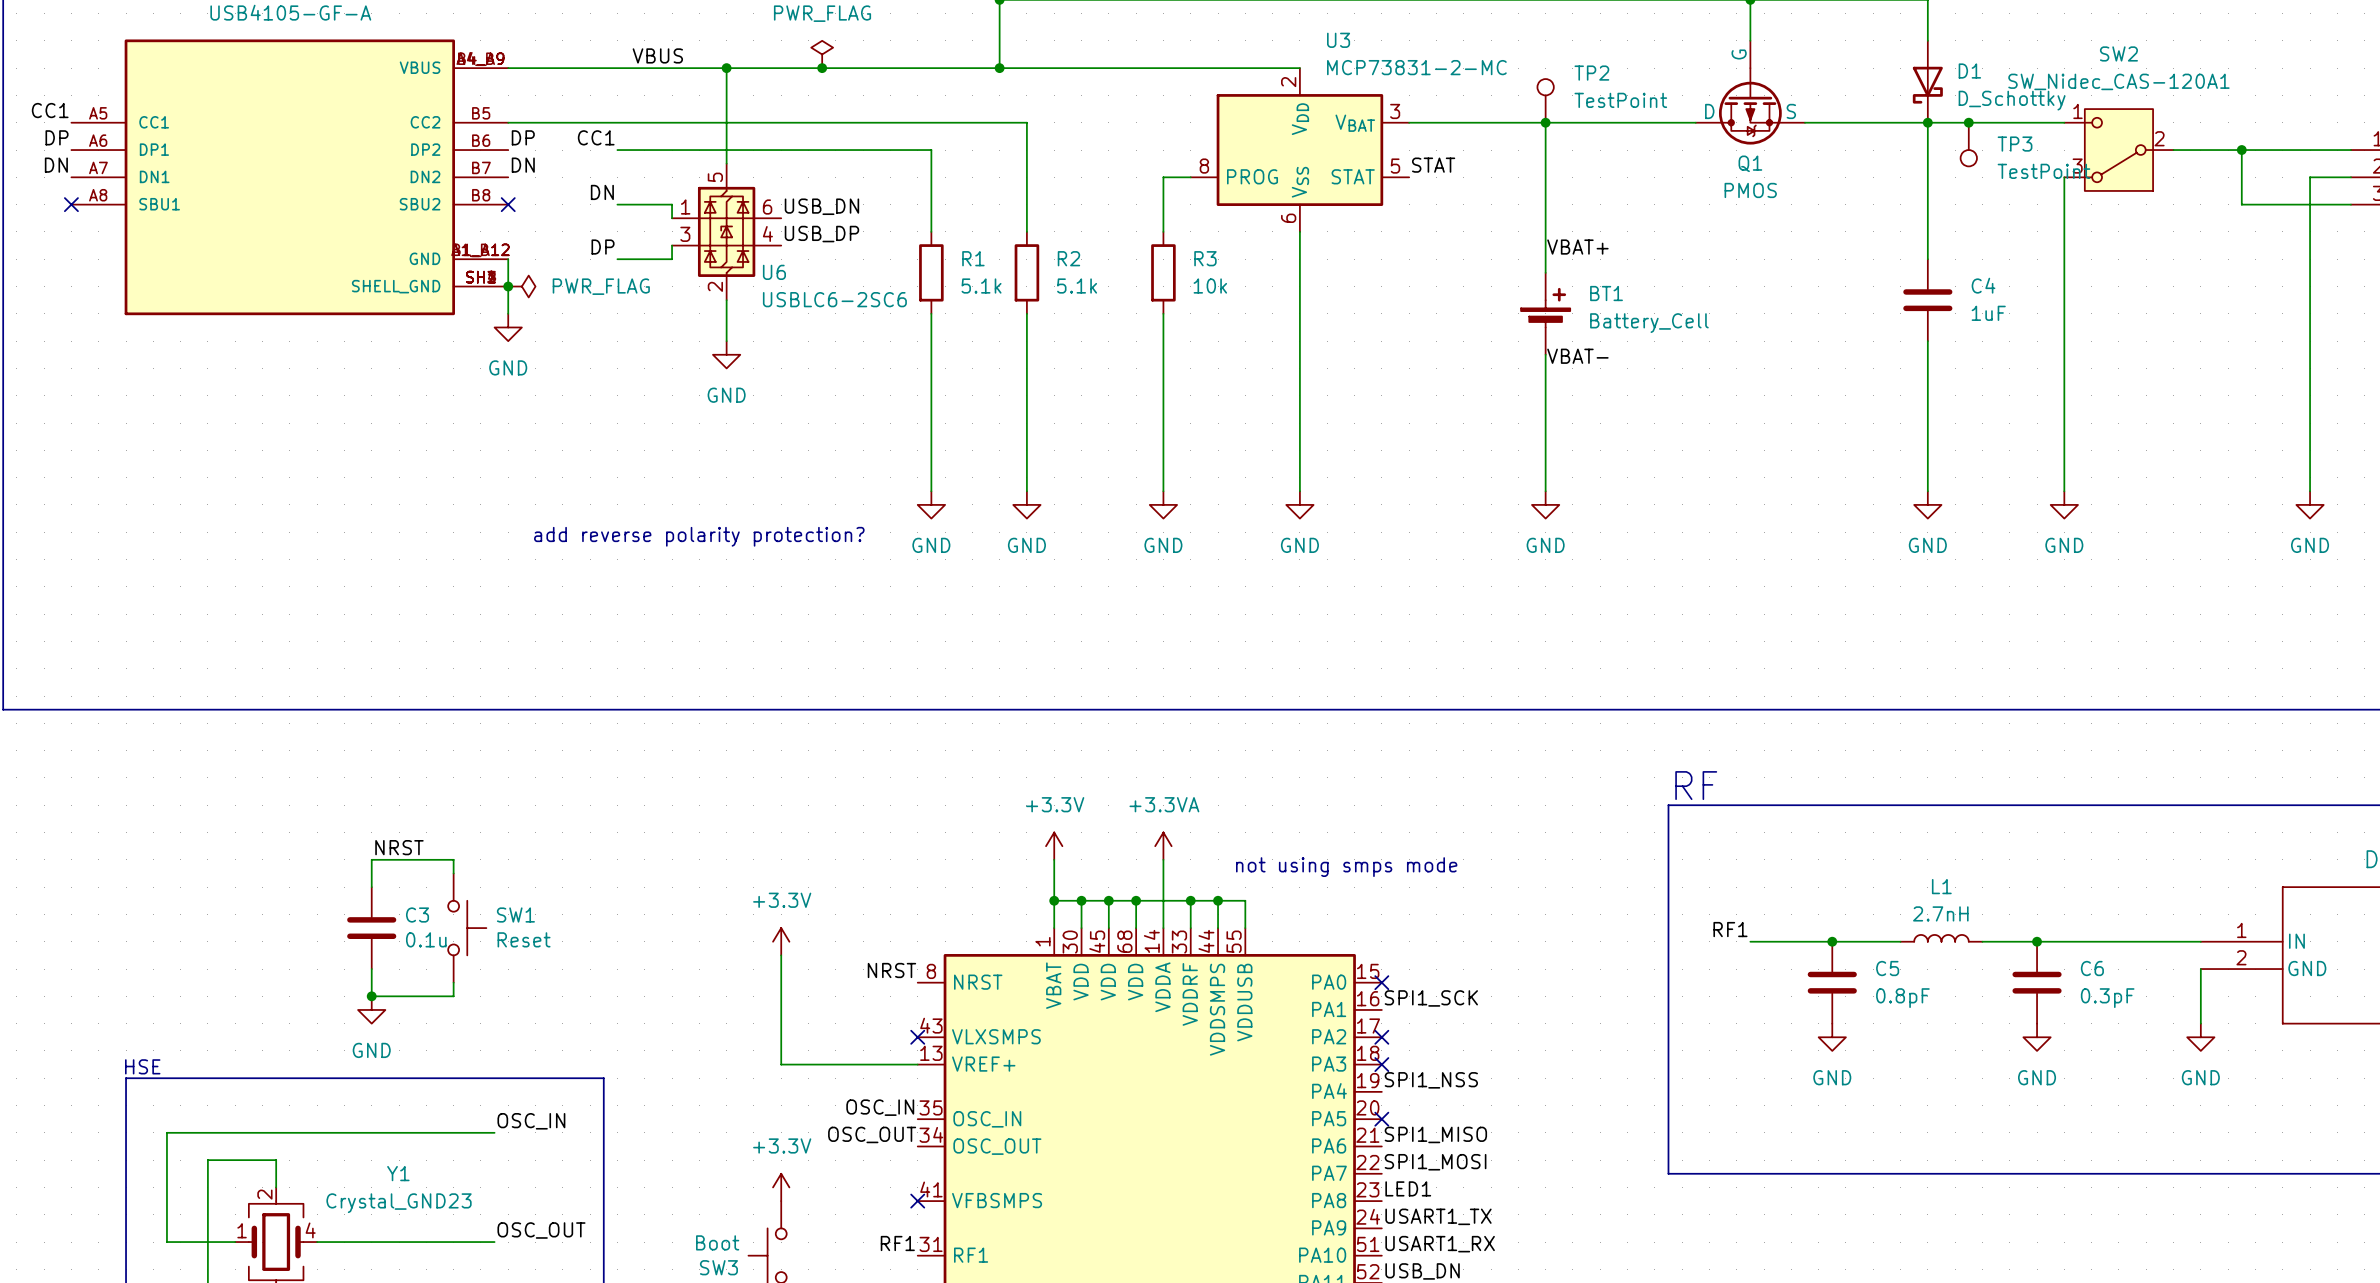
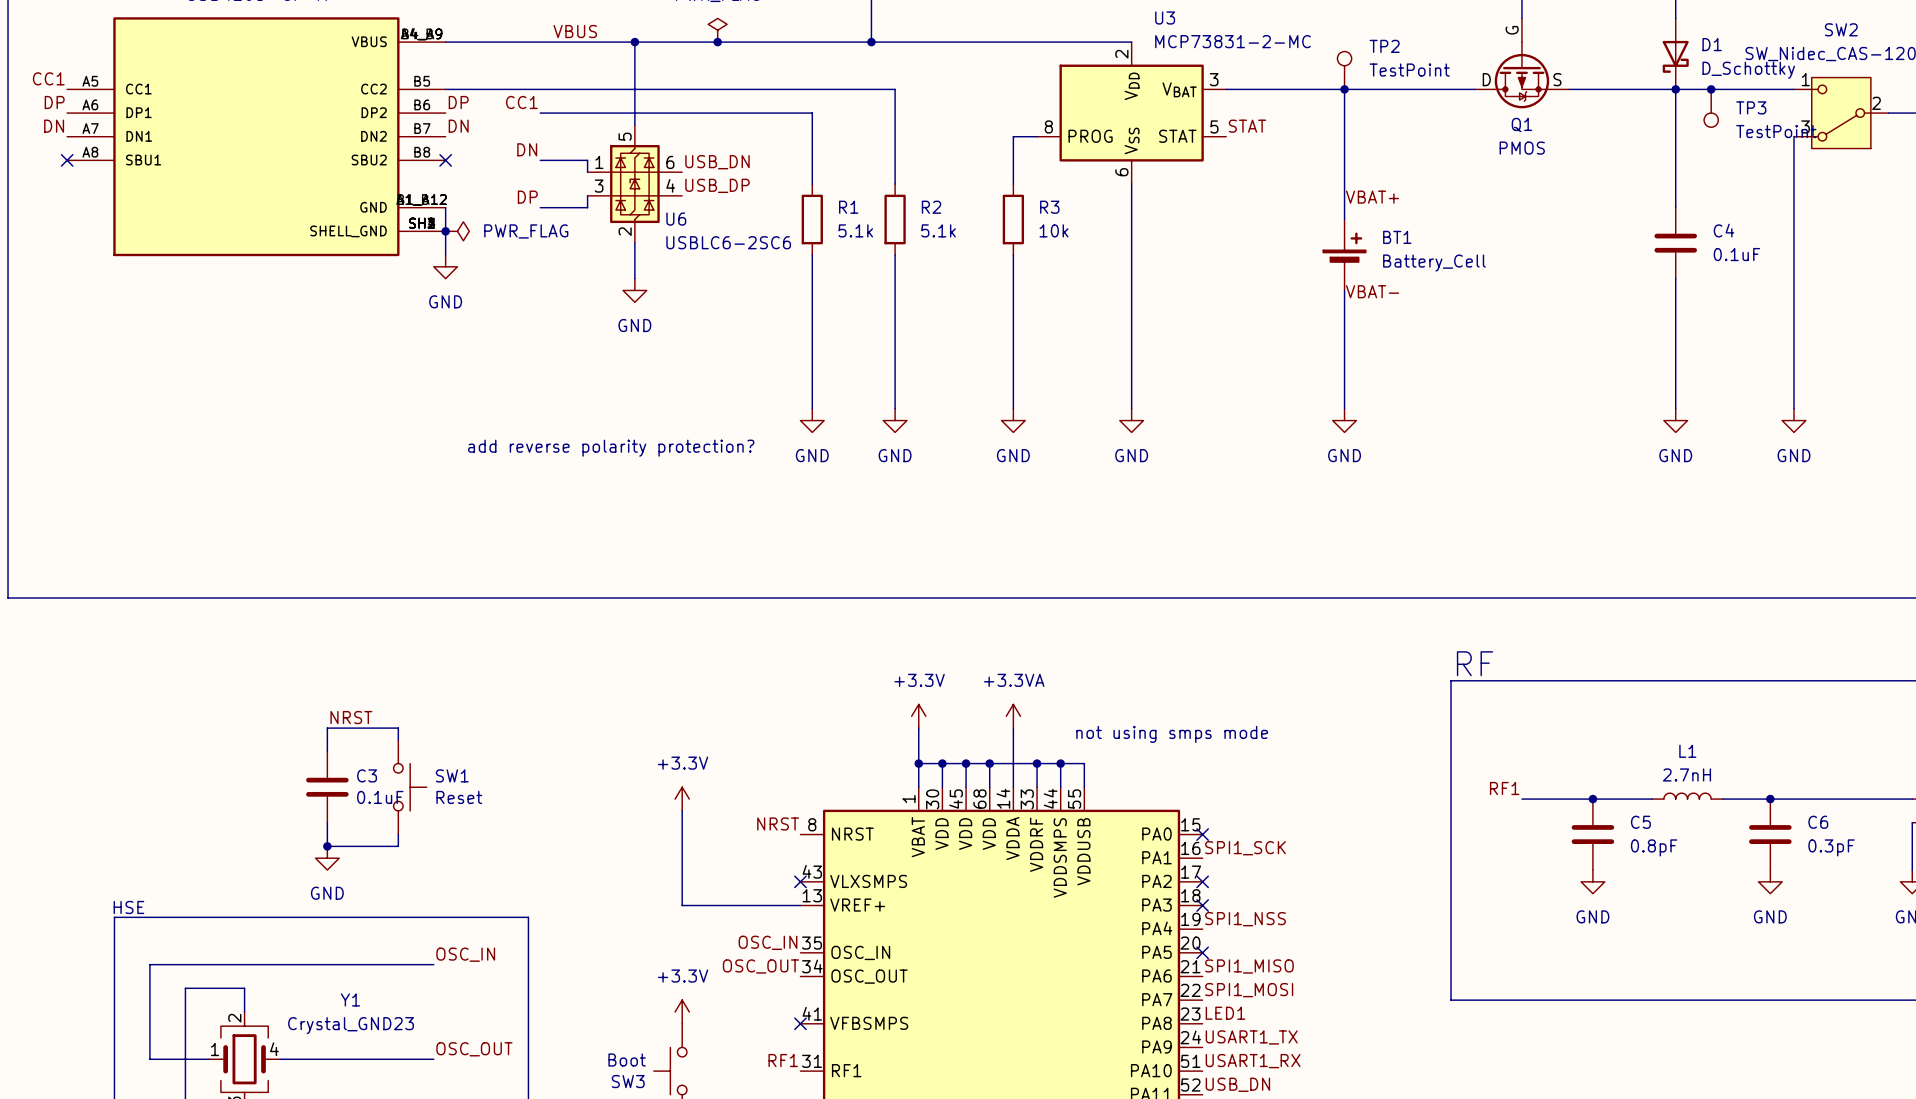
C4 value: 1uF (1988, 313) -> 0.1uF (1736, 254)
C3 value: 0.1u (426, 939) -> 0.1uF (380, 797)

